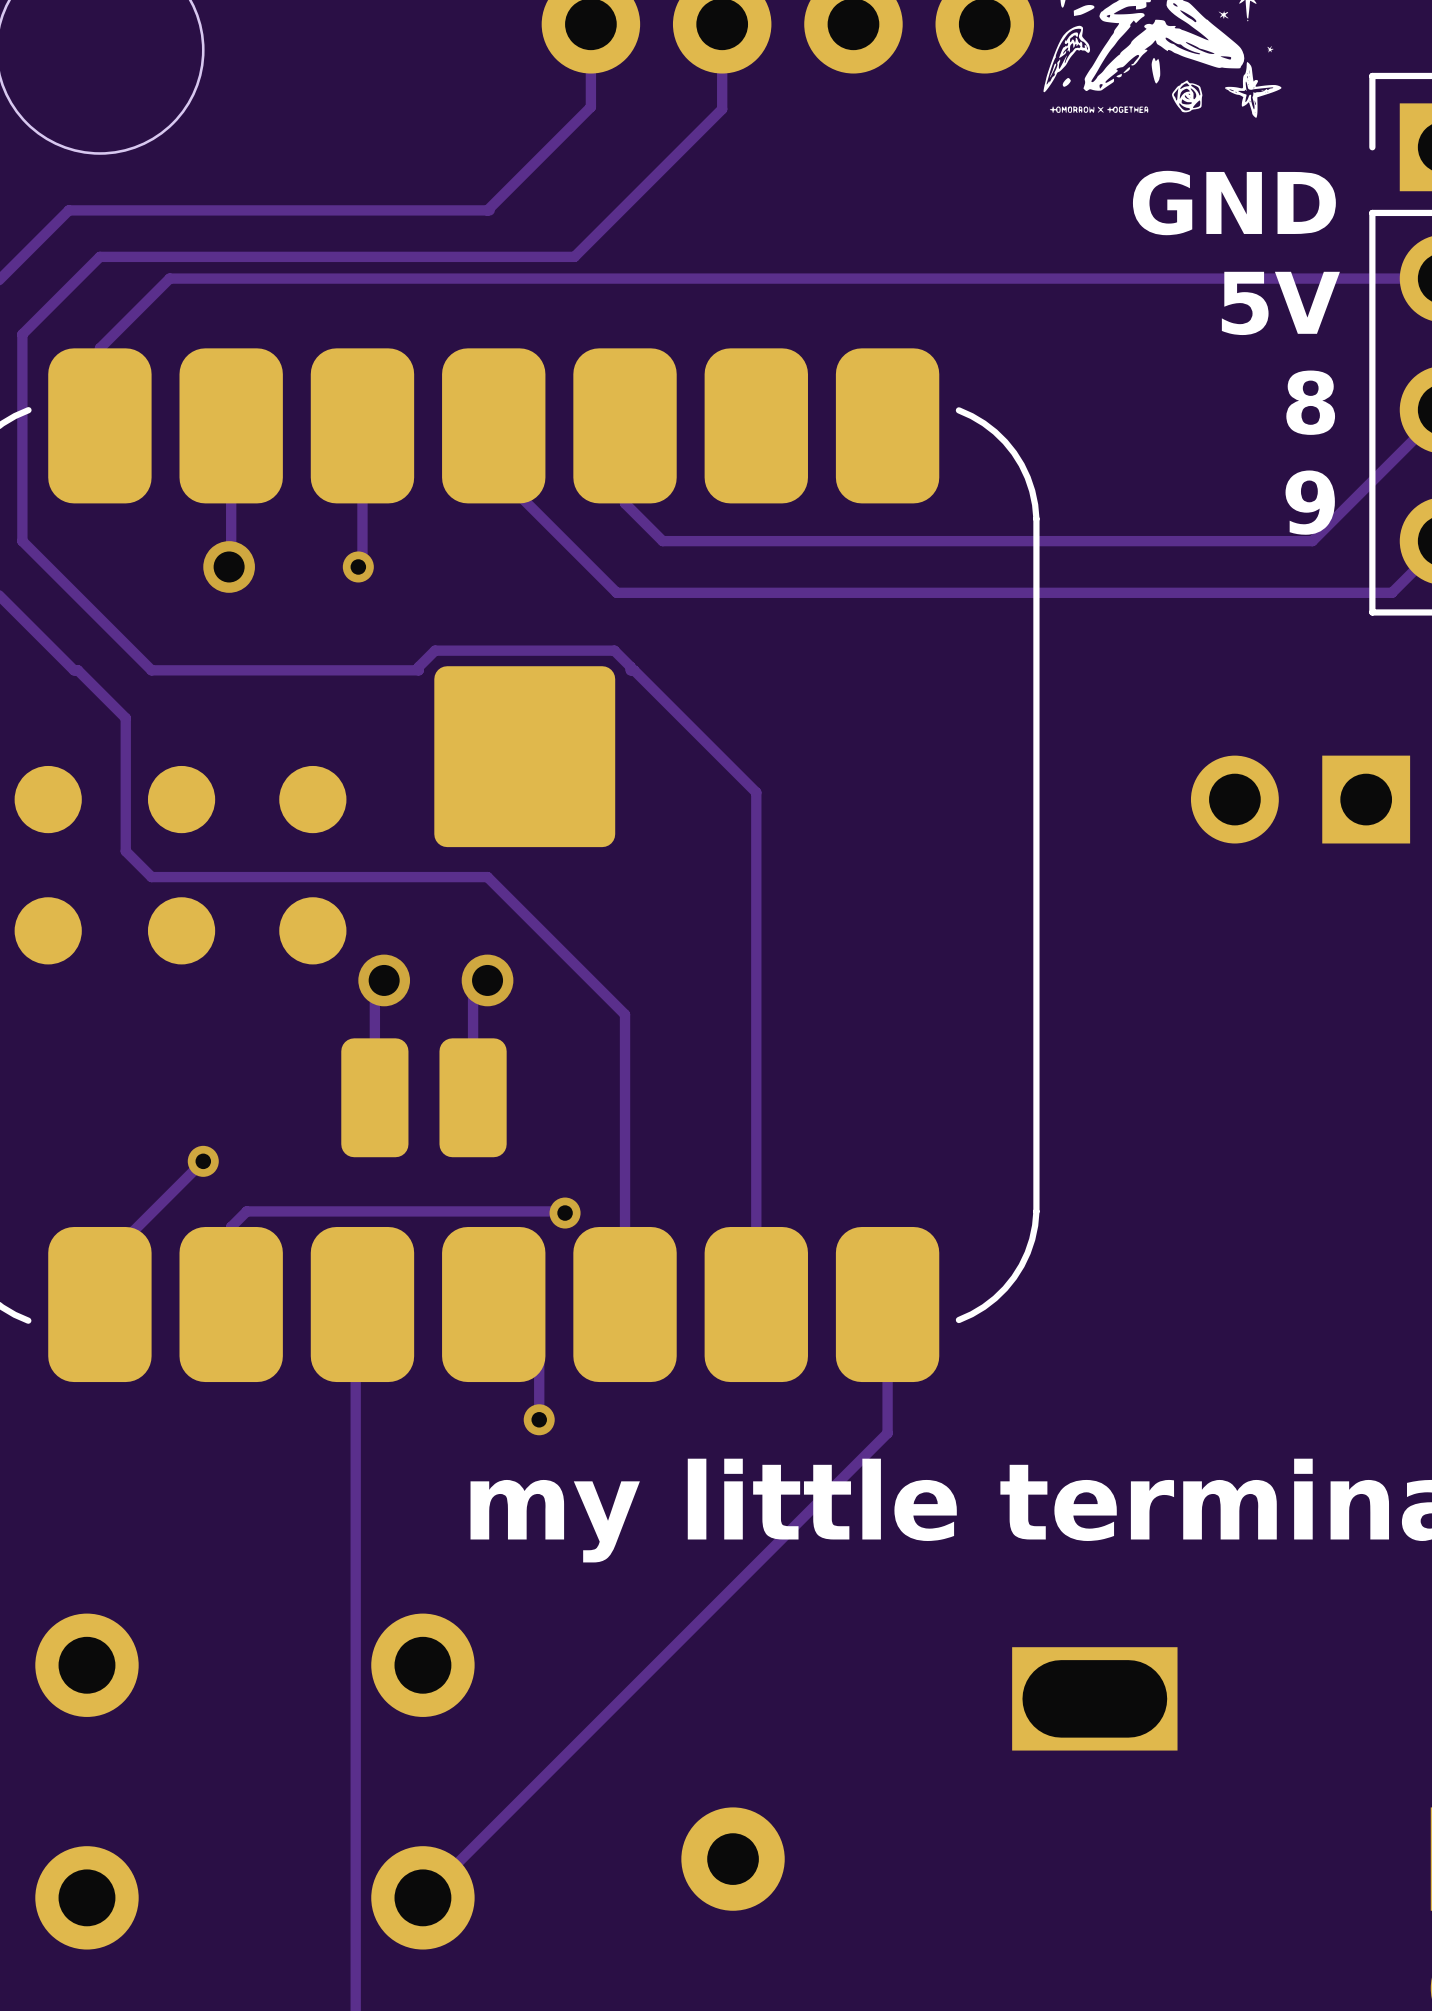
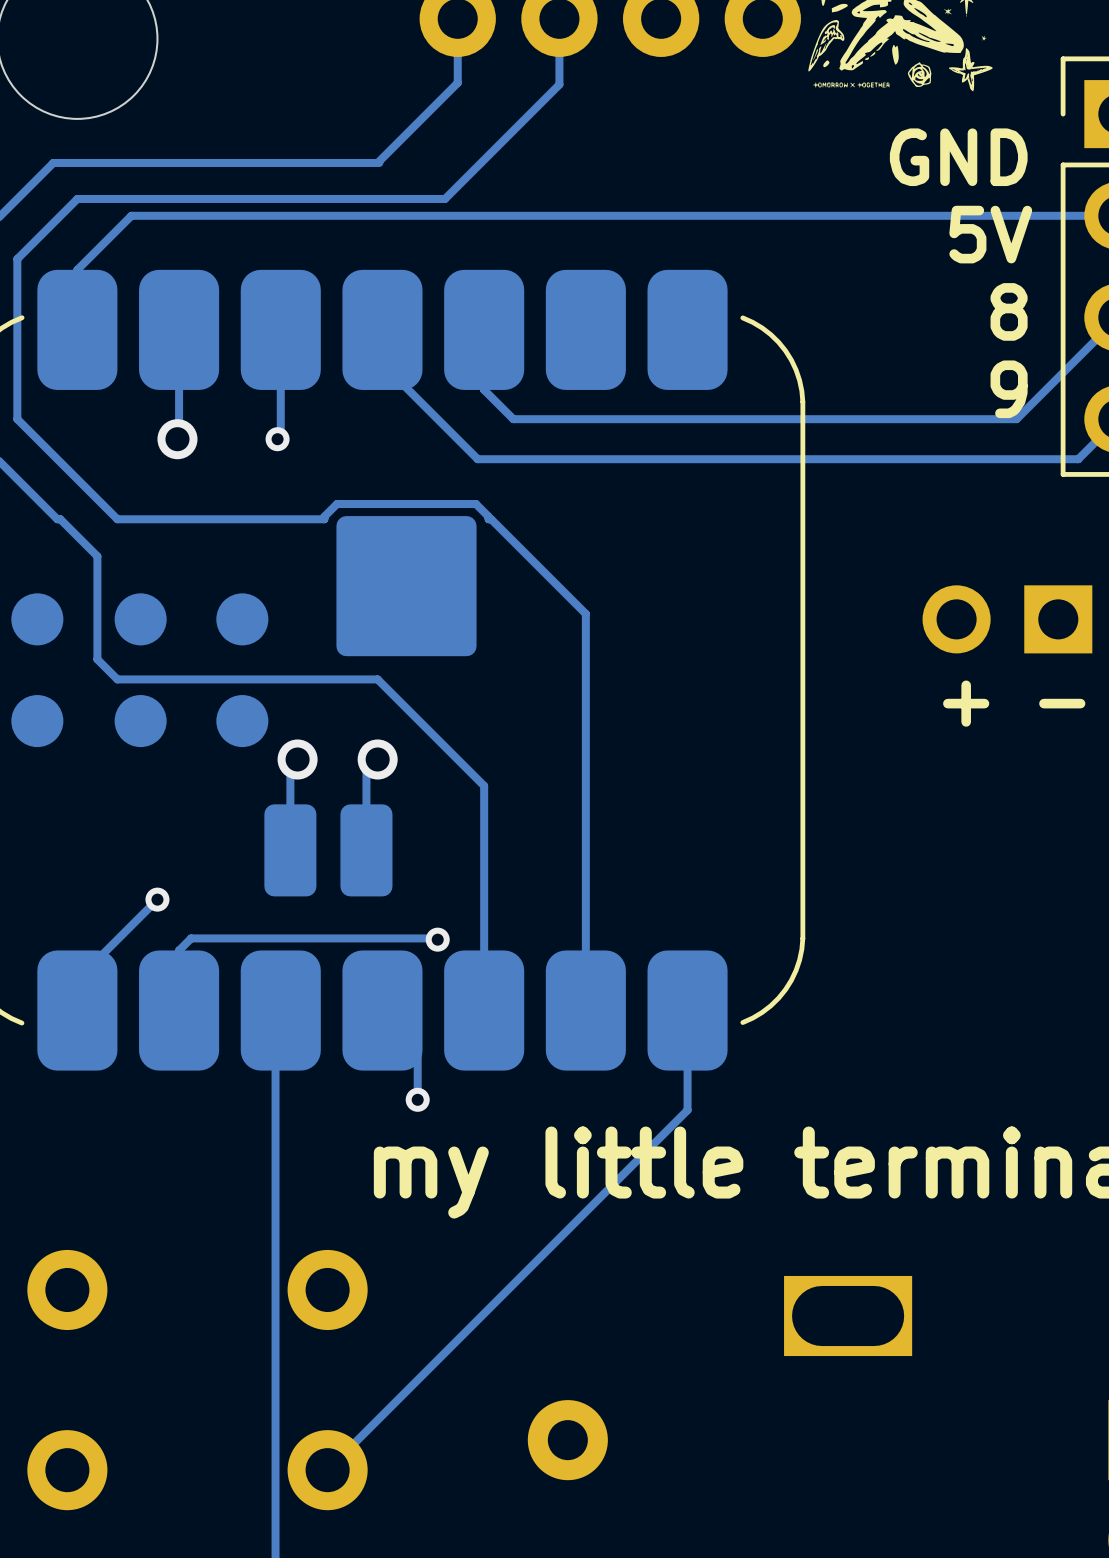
text: none -> - + (1014, 703)

